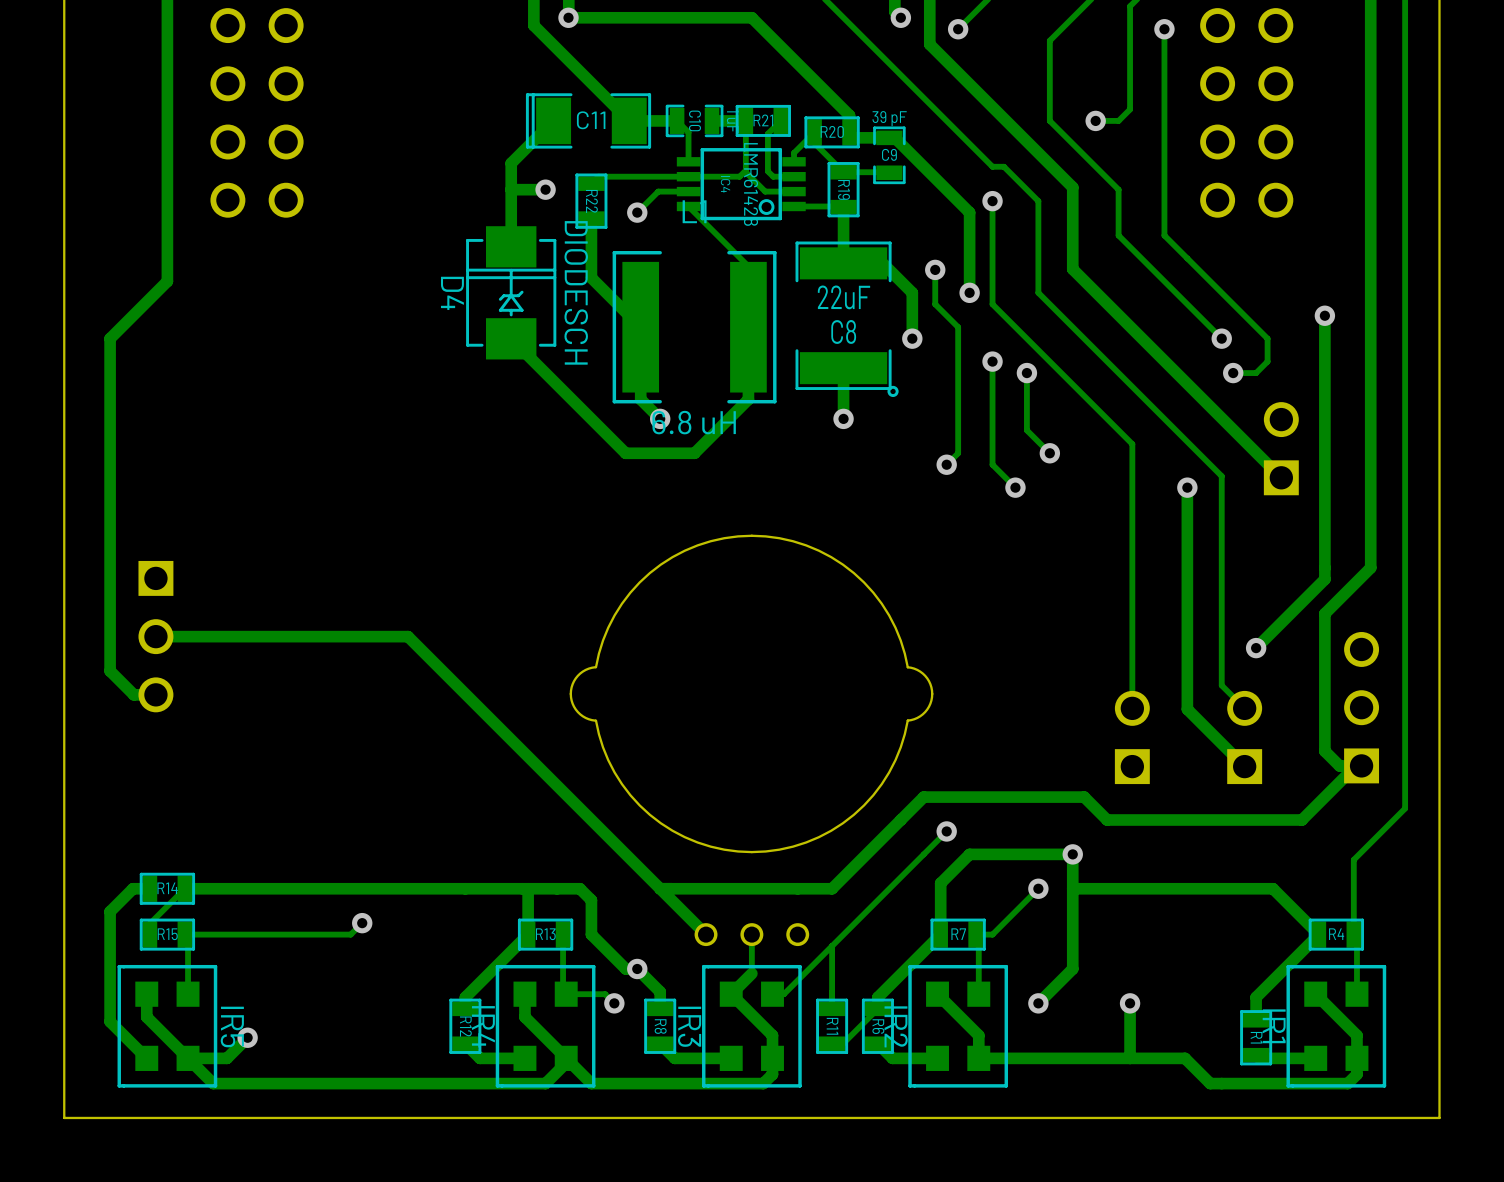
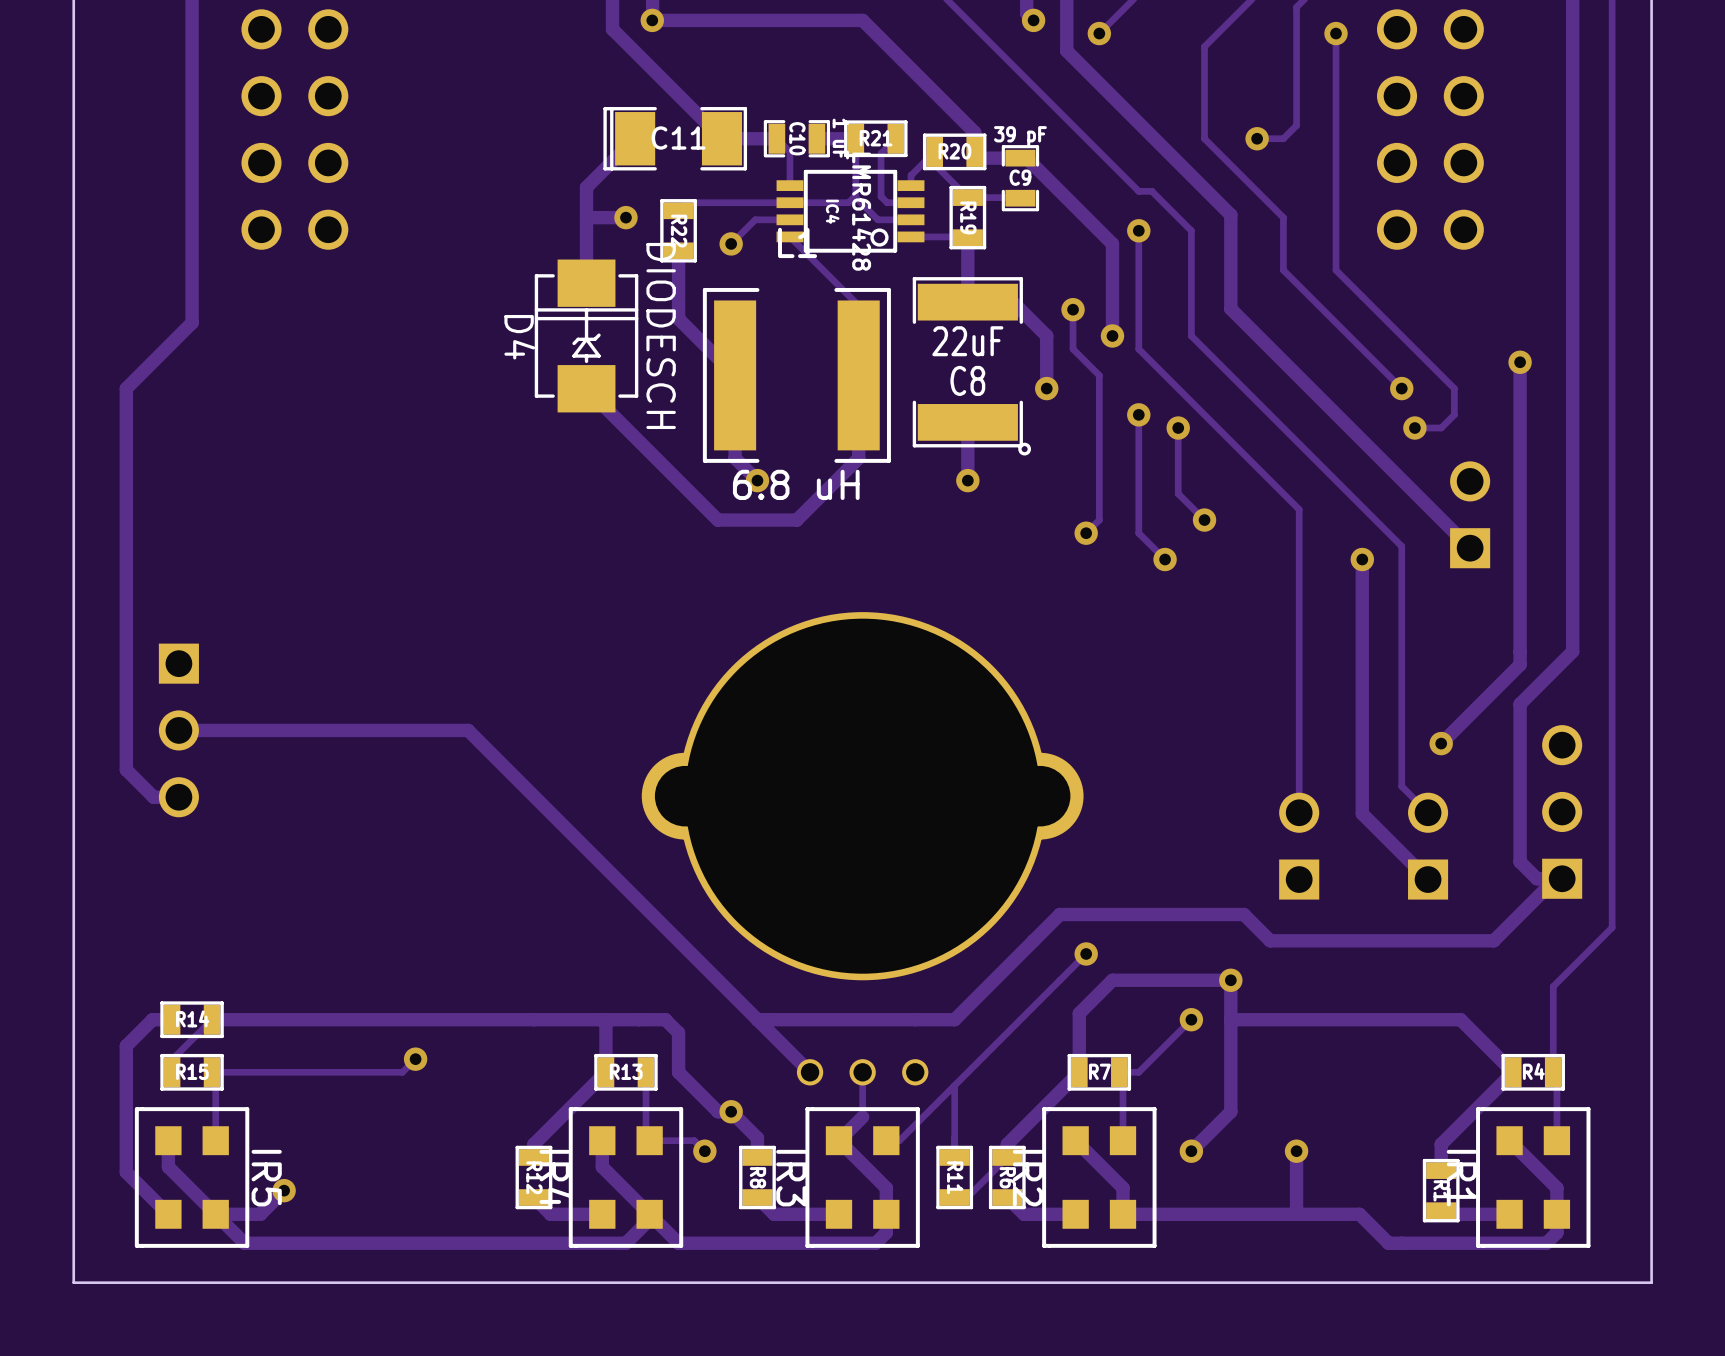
board edge: (595, 667) (603, 640) (614, 615) (630, 592) (649, 573) (684, 550) (710, 541) (738, 536) (765, 536) (792, 541) (818, 550) (842, 564) (864, 582) (881, 603) (895, 627) (907, 667) (917, 669) (925, 675) (930, 684) (932, 693) (930, 703) (925, 712) (917, 717) (907, 720) (900, 747) (889, 772) (864, 805) (842, 823) (818, 837) (792, 846) (765, 851) (738, 851) (710, 846) (684, 837) (649, 814) (630, 795) (614, 772) (603, 747) (595, 720) -> none
board edge: (595, 667) (585, 669) (577, 675) (572, 684) (570, 693) (572, 703) (577, 712) (585, 717) (595, 720) -> none
part: none -> (862, 796)

